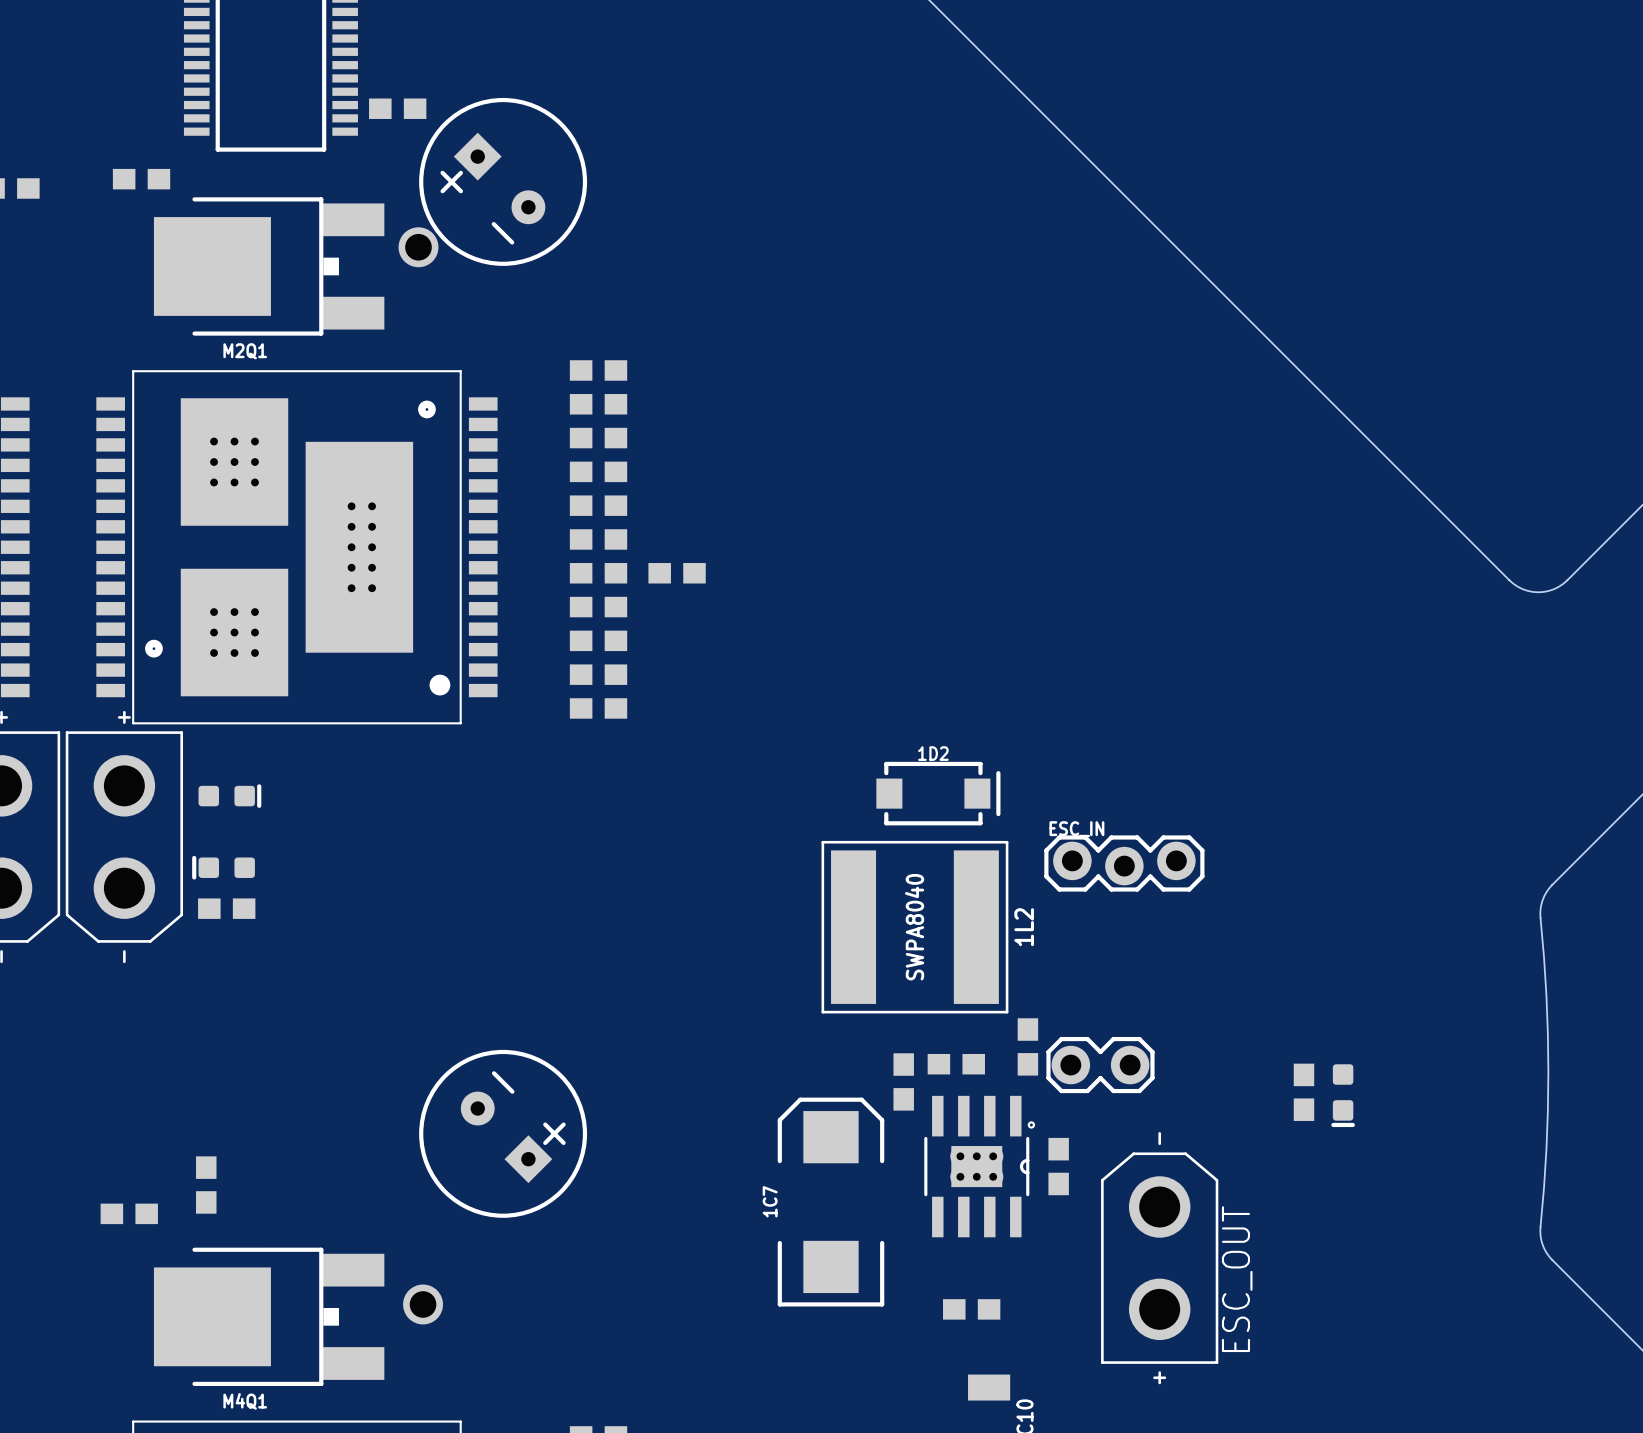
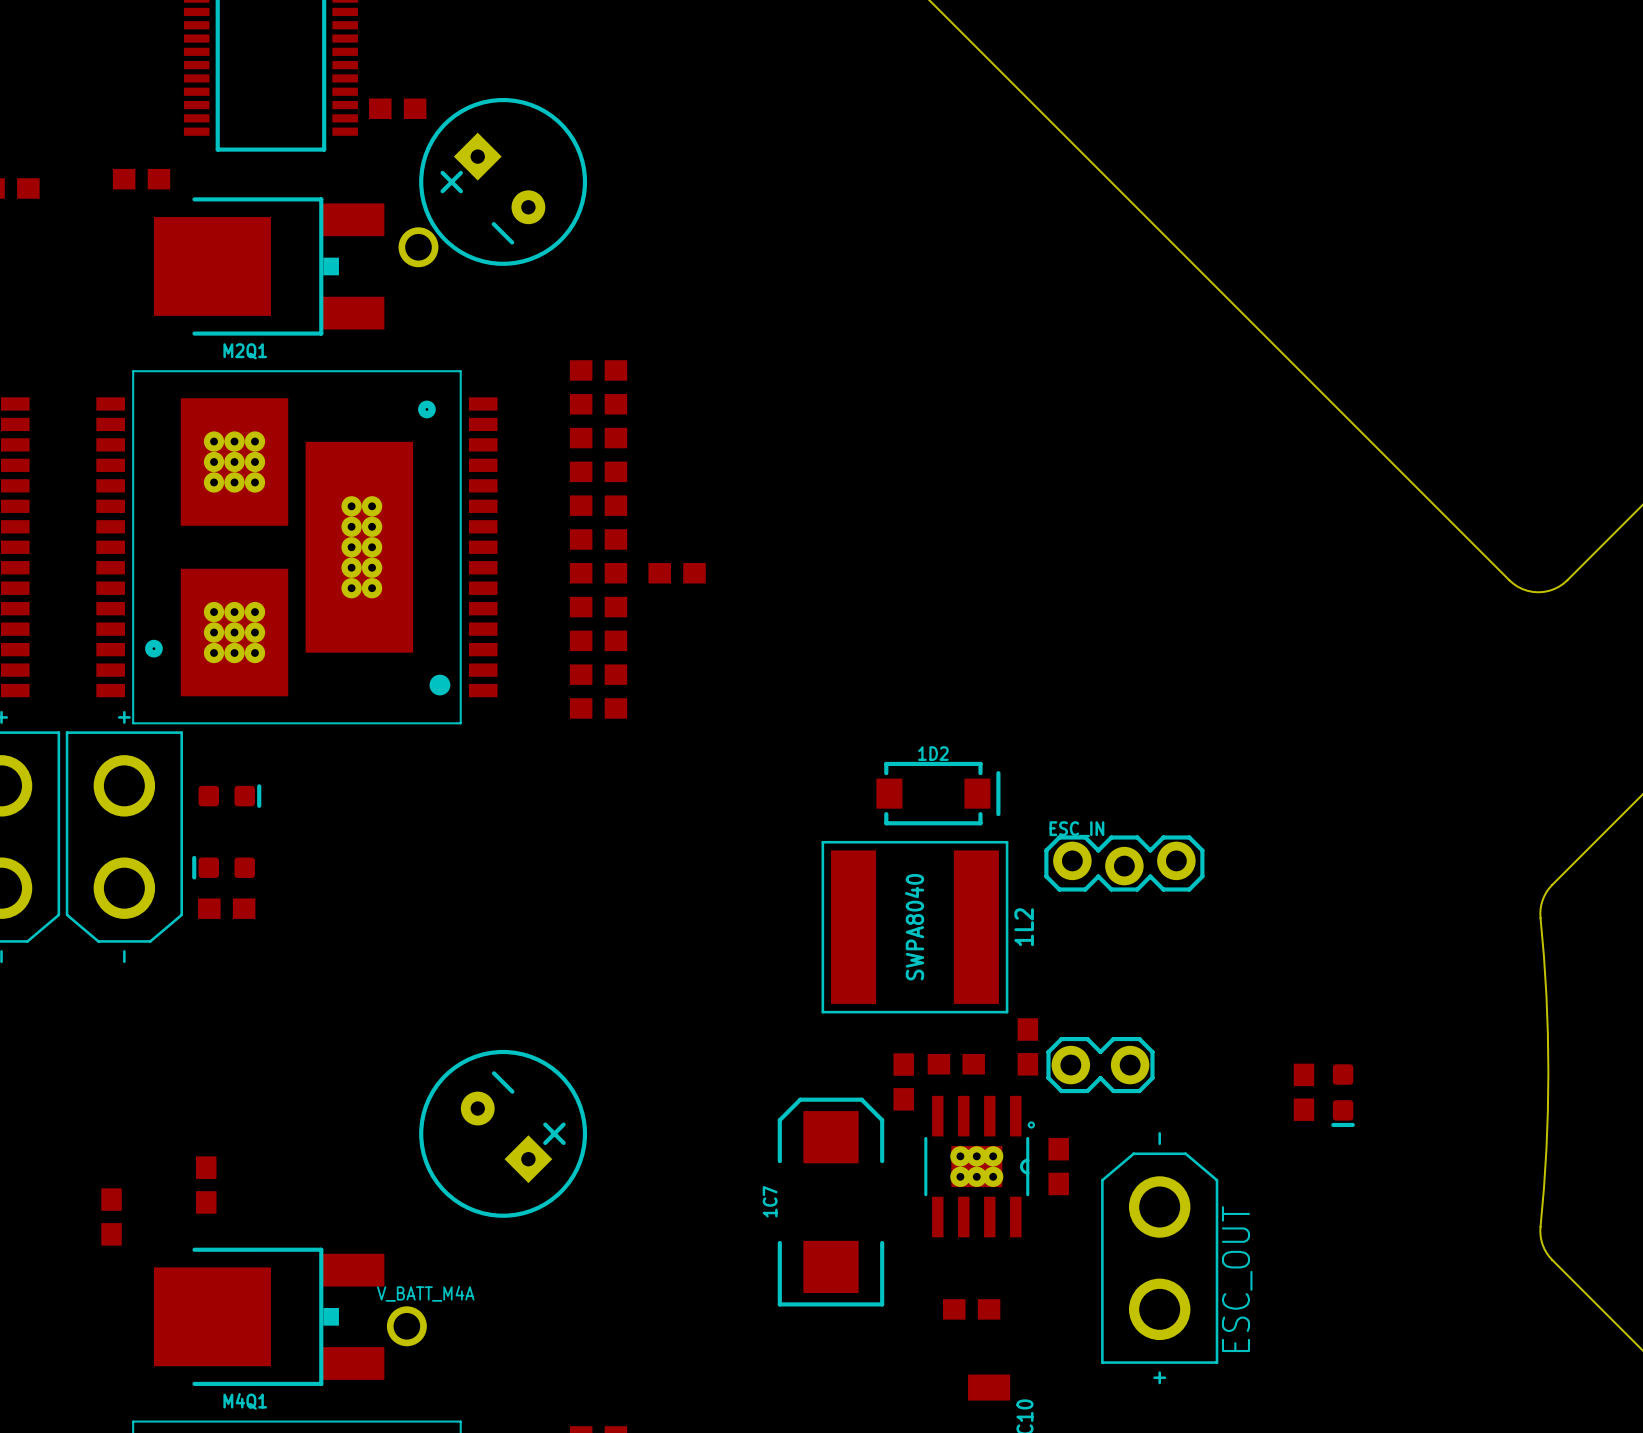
part rotation: 0° (129, 1213) -> 90° clockwise (111, 1216)
part: (423, 1304) -> none
V_BATT_M4A: none -> (406, 1326)

